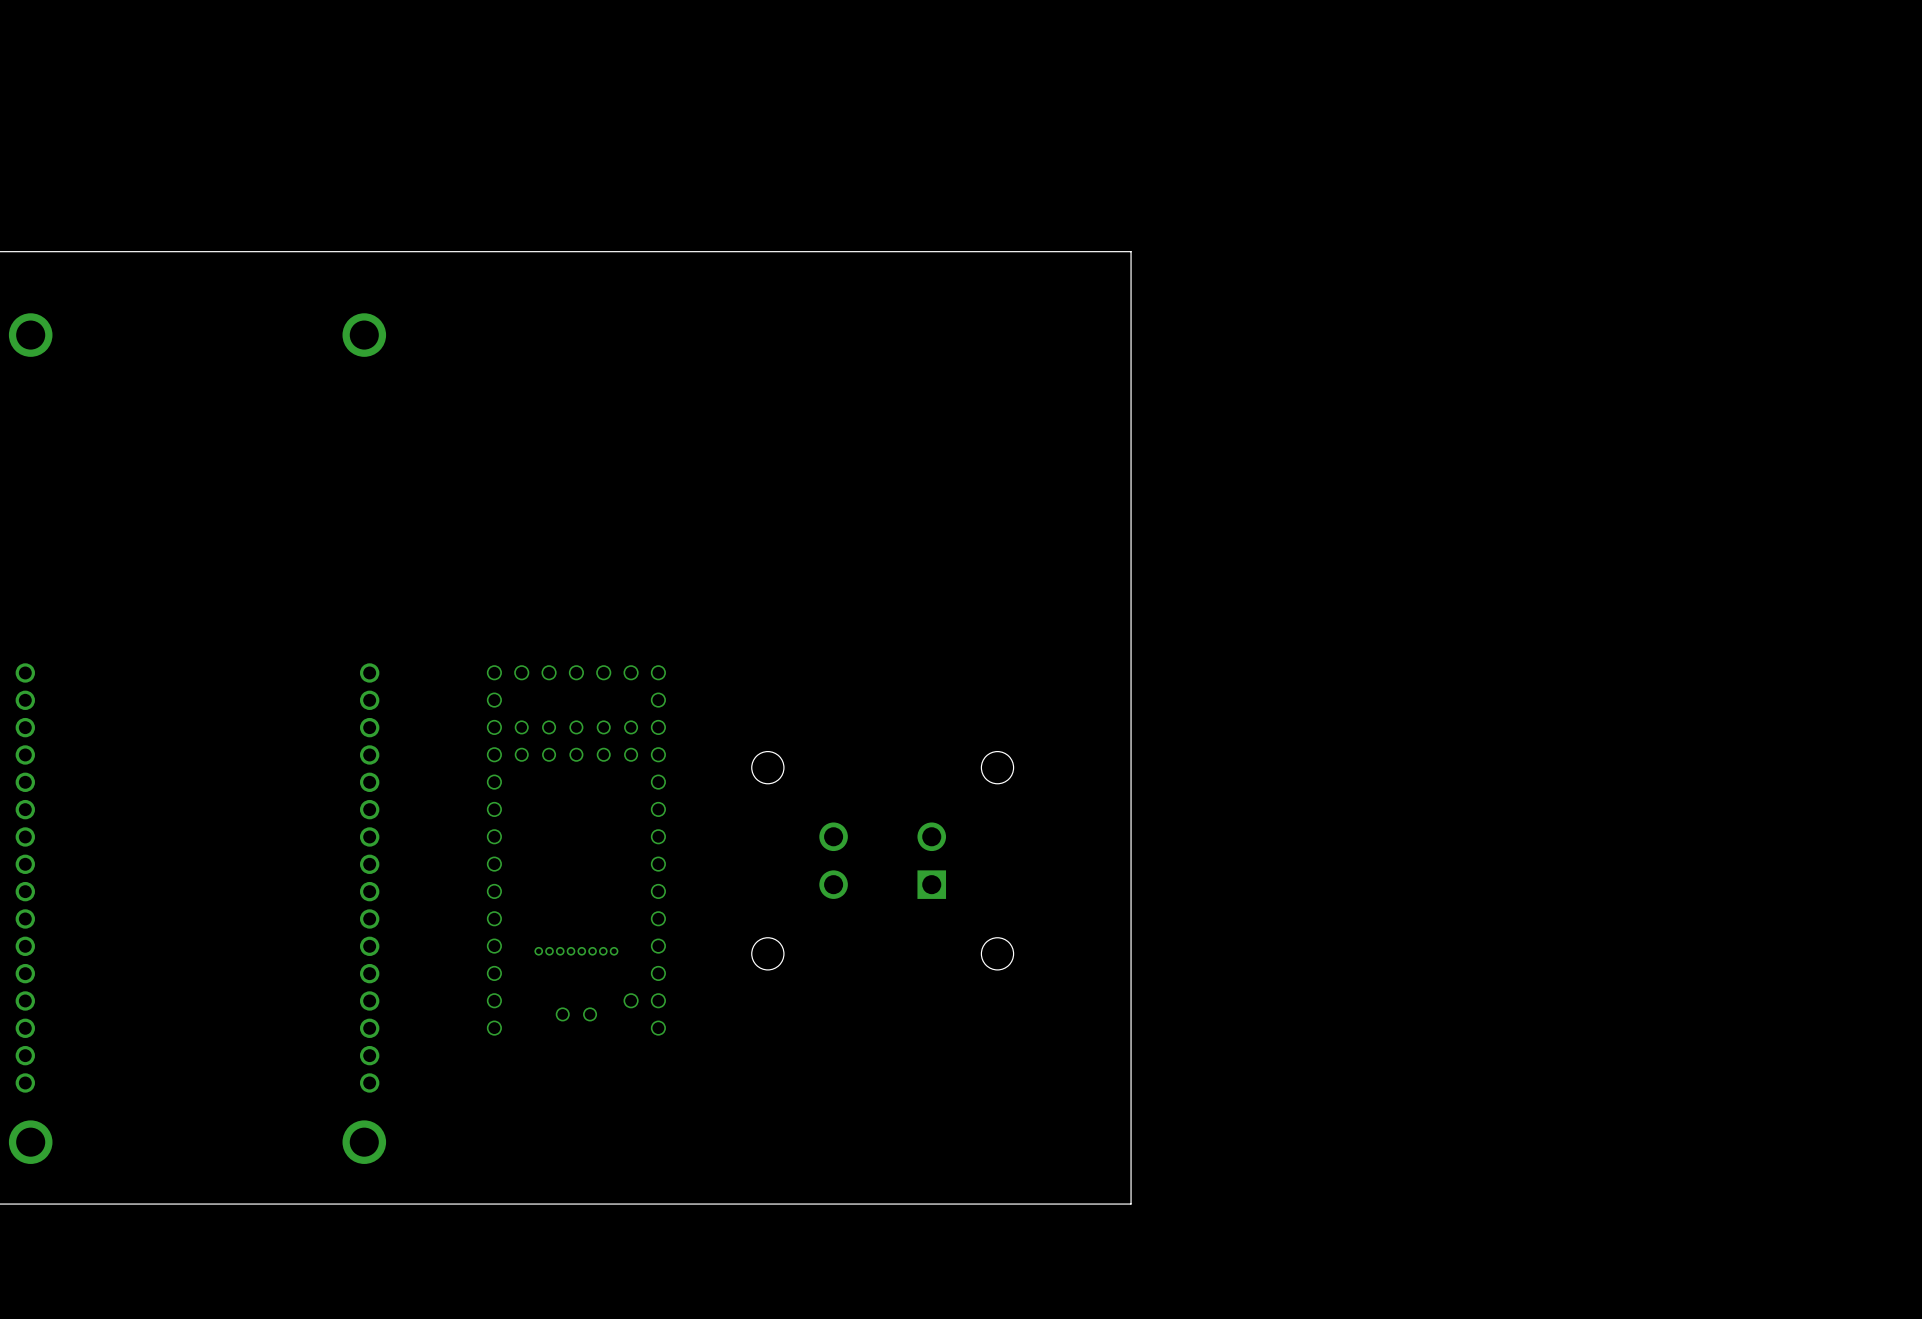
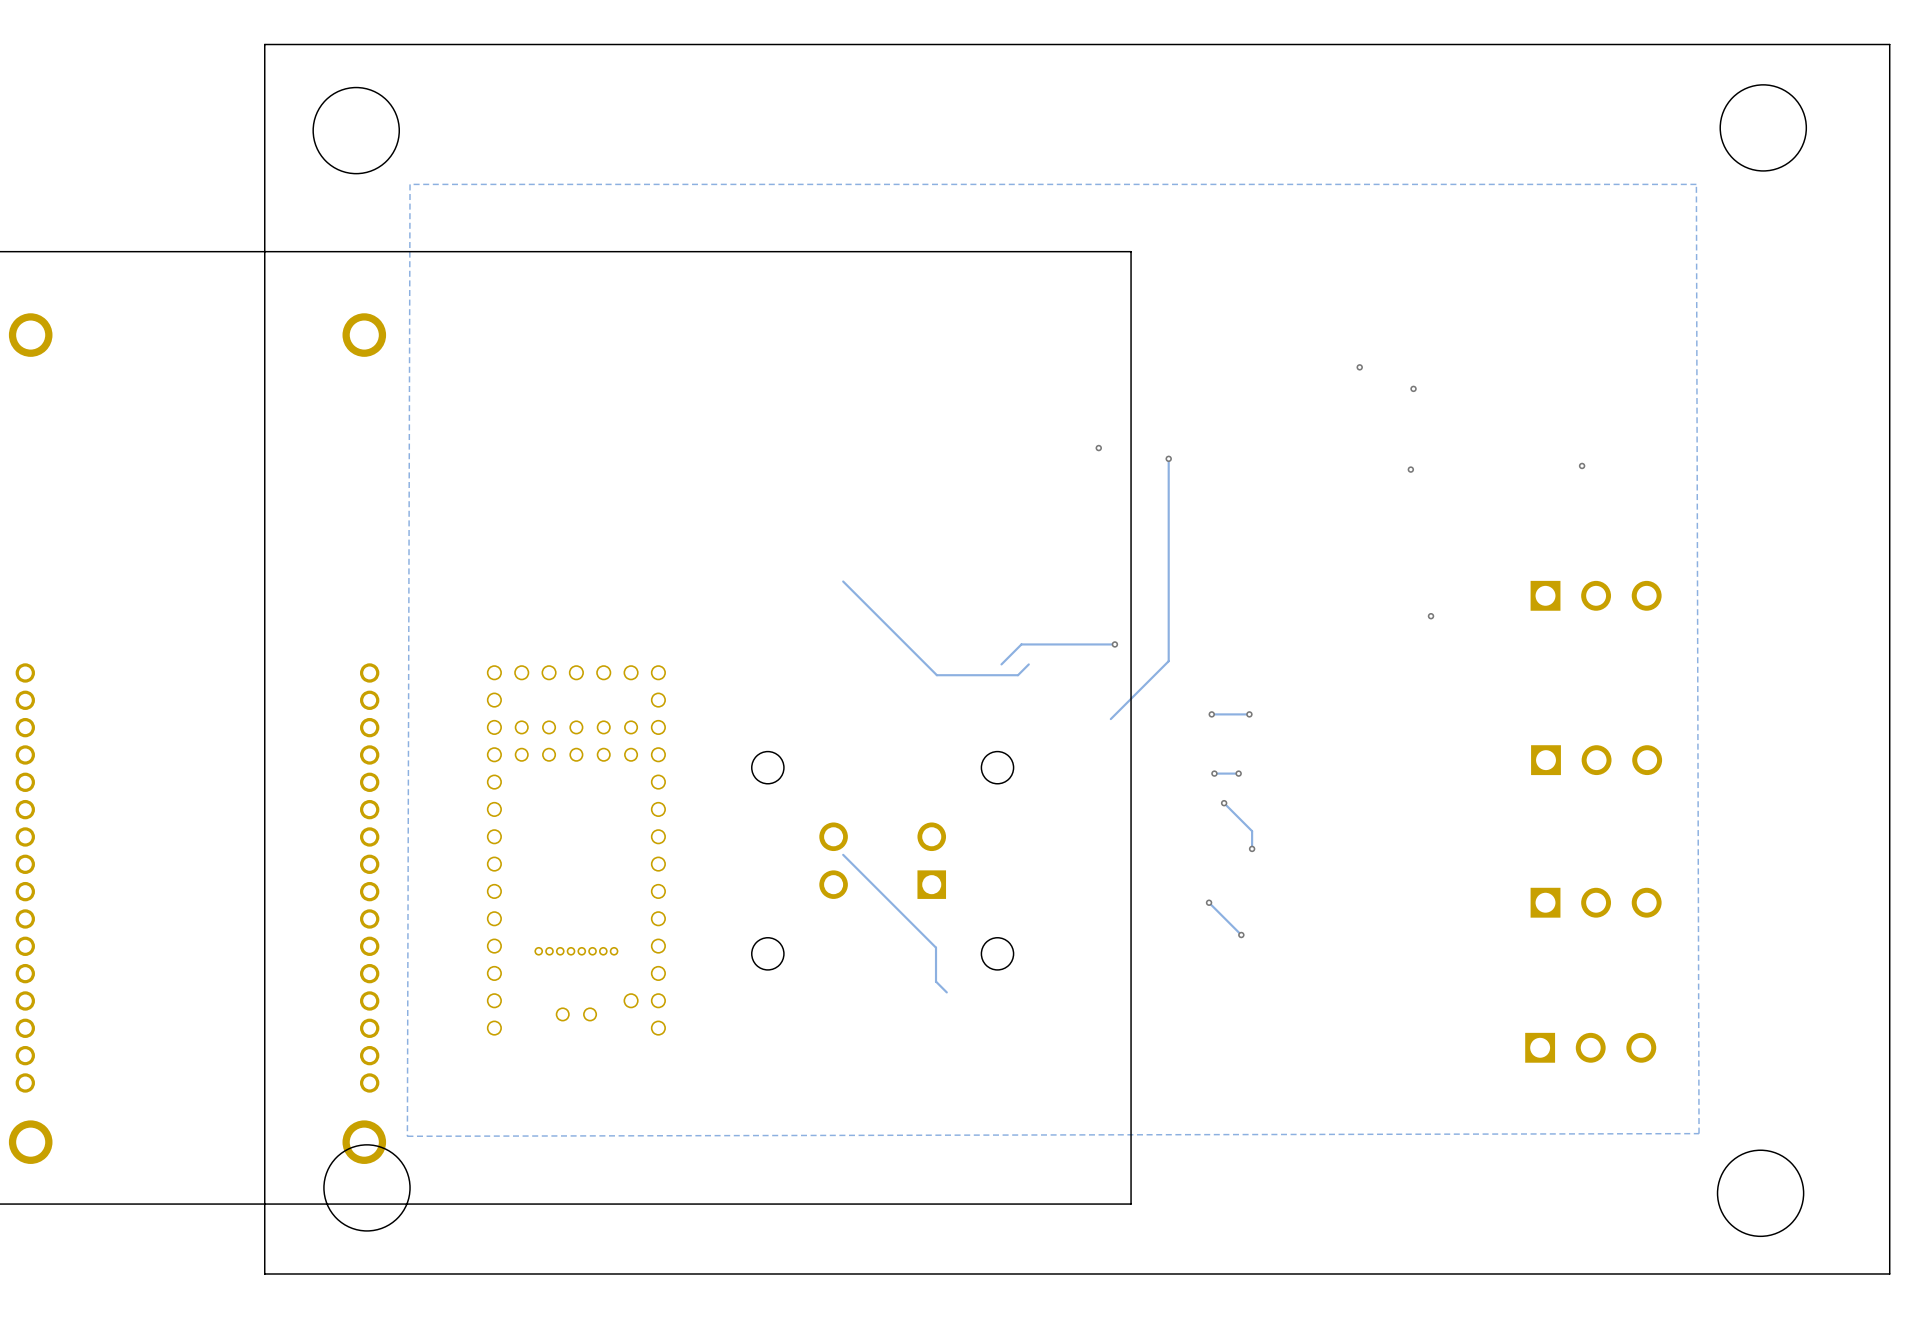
board edge: none -> (1889, 44) (264, 44) (264, 1273) (1889, 1273) (1889, 44)
round board edge: none -> [1719, 84, 1807, 172]
round board edge: none -> [312, 87, 400, 174]
zone outline: none -> (1696, 184) (410, 184) (407, 1136) (1699, 1133) (1696, 184)
via: none -> (1359, 367)
via: none -> (1413, 388)
via: none -> (1098, 448)
track: none -> (1168, 458) (1168, 661) (1110, 719)
via: none -> (1168, 458)
via: none -> (1582, 465)
via: none -> (1410, 469)
track: none -> (843, 581) (936, 675) (1018, 675) (1028, 664)
part: none -> (1596, 595)
via: none -> (1431, 616)
track: none -> (1114, 644) (1021, 644) (1001, 664)
via: none -> (1114, 644)
via: none -> (1211, 714)
track: none -> (1249, 714) (1211, 714)
via: none -> (1249, 714)
part: none -> (1596, 760)
via: none -> (1214, 773)
track: none -> (1238, 773) (1214, 773)
via: none -> (1238, 773)
track: none -> (1224, 803) (1252, 831) (1252, 848)
via: none -> (1224, 803)
via: none -> (1252, 848)
track: none -> (843, 854) (936, 947) (936, 981) (946, 992)
track: none -> (1209, 902) (1241, 935)
via: none -> (1209, 902)
part: none -> (1596, 902)
via: none -> (1241, 935)
part: none -> (1590, 1047)
round board edge: none -> [323, 1144, 411, 1232]
round board edge: none -> [1717, 1149, 1804, 1237]

